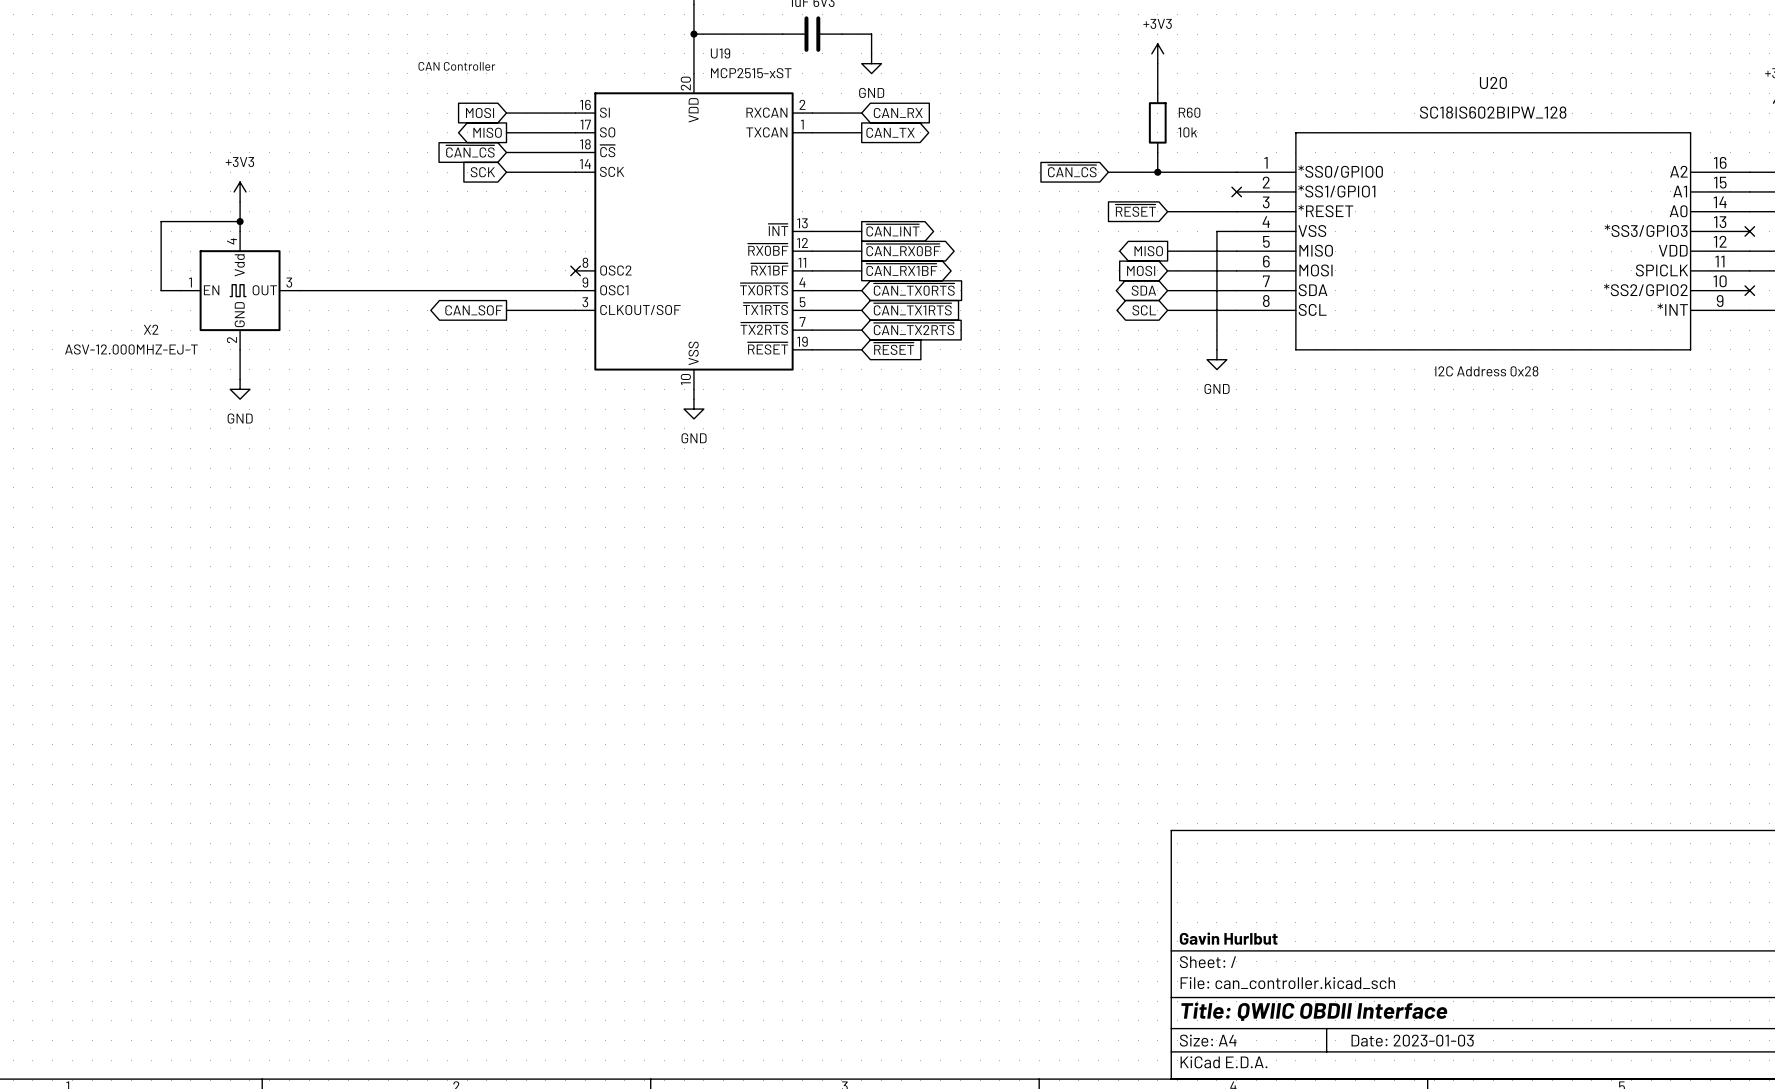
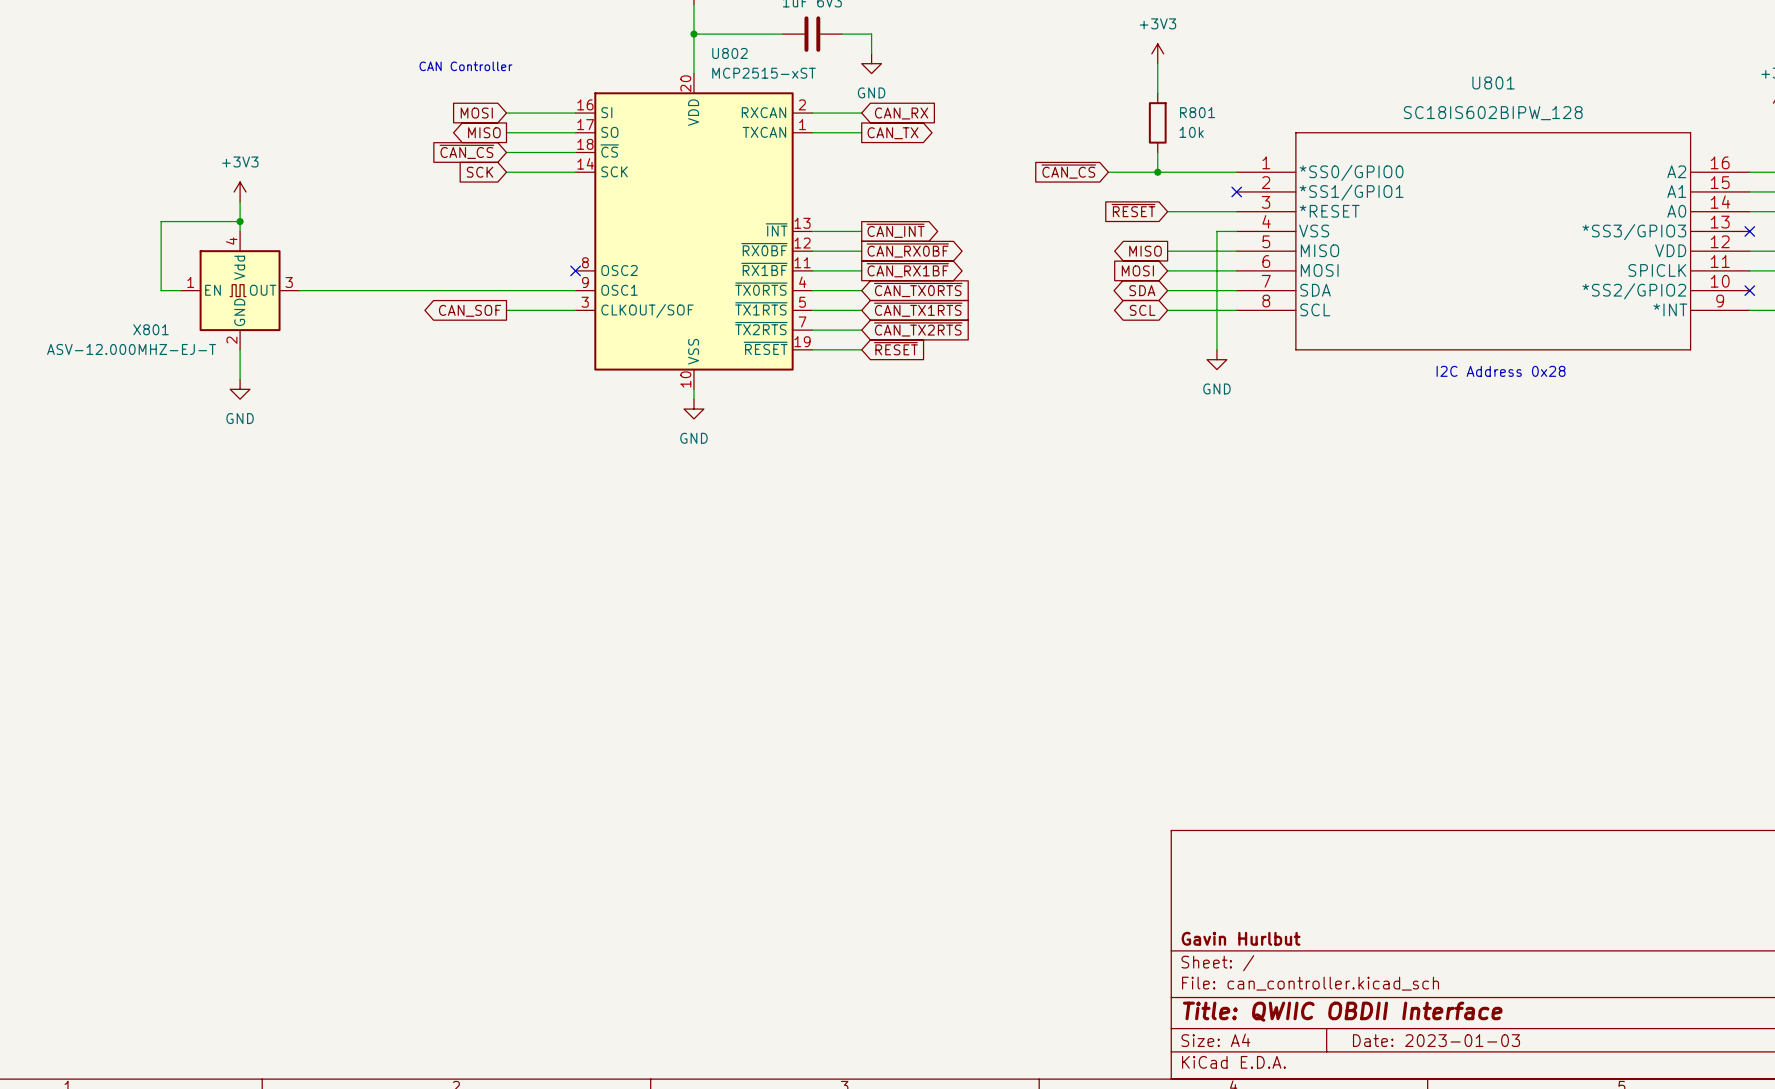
U19 name: U19 (720, 53) -> U802 (729, 53)
U20 name: U20 (1493, 82) -> U801 (1493, 82)
R60 name: R60 (1189, 112) -> R801 (1197, 112)
X2 name: X2 (151, 329) -> X801 (151, 329)

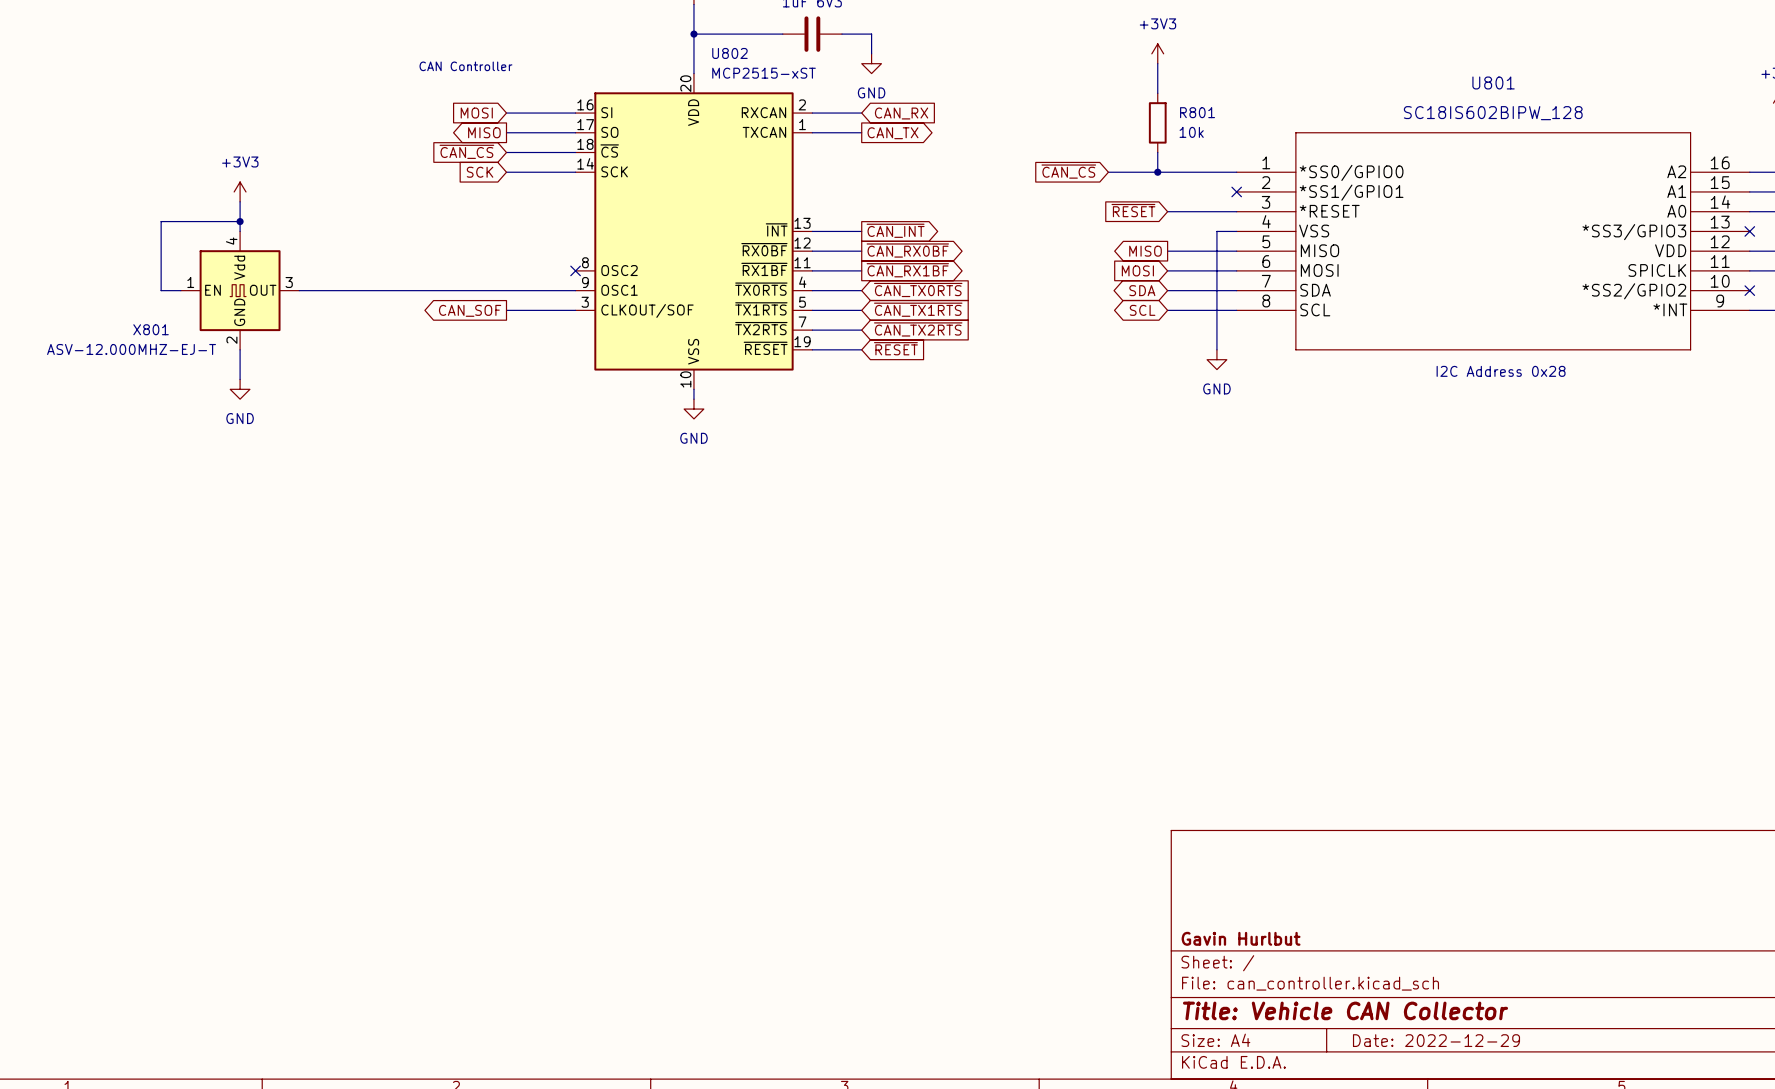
title block: Title: QWIIC OBDII Interface (1342, 1011) -> Title: Vehicle CAN Collector (1345, 1010)
title block: Date: 2023-01-03 (1436, 1040) -> Date: 2022-12-29 (1436, 1040)

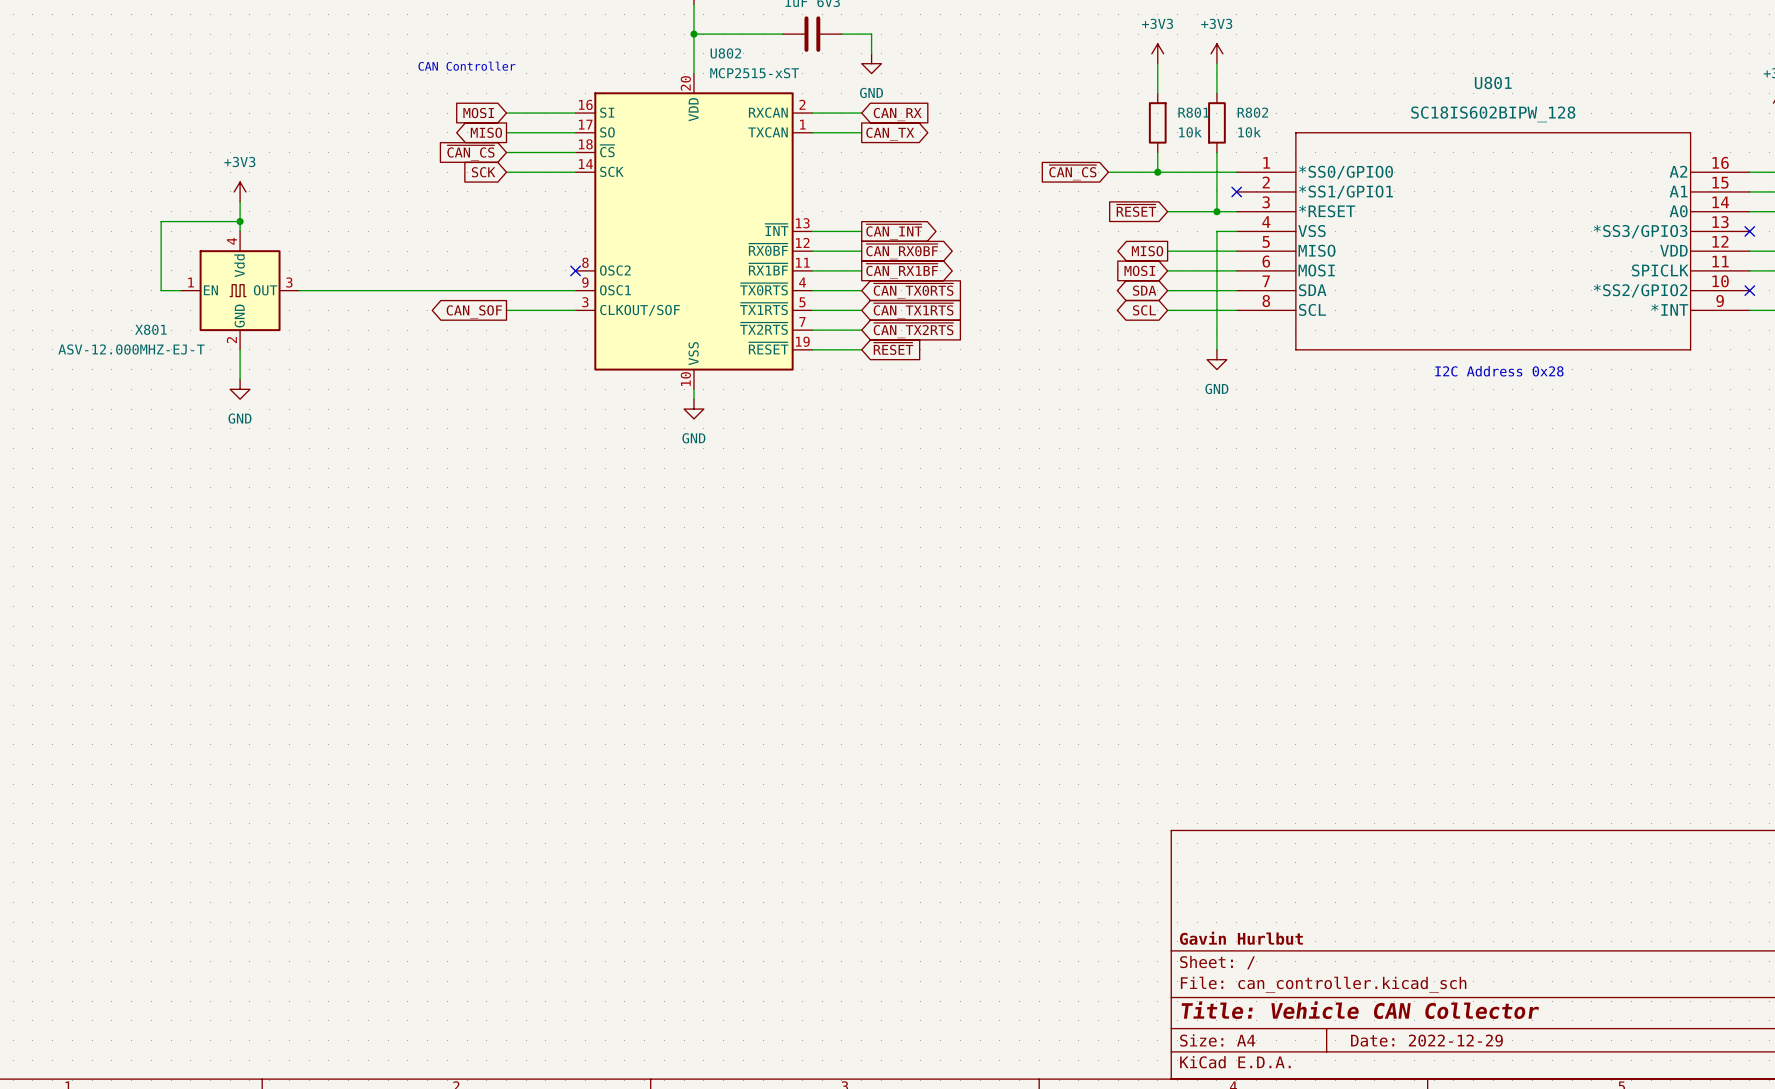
power symbol: none -> +3V3 (1216, 53)
wire: none -> (1216, 63) (1216, 93)
R802: none -> 10k (1216, 122)
wire: none -> (1216, 152) (1216, 211)
junction: none -> (1216, 211)

